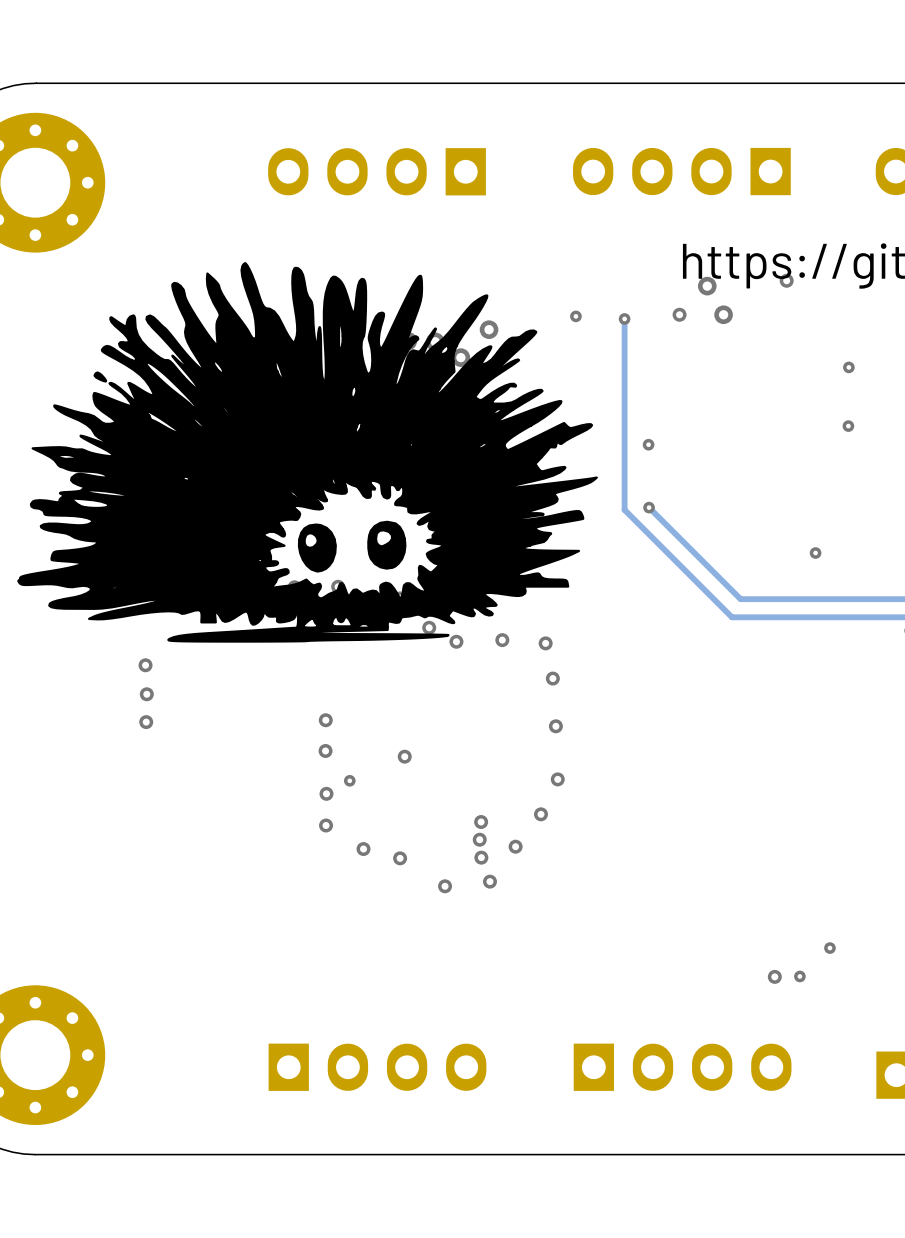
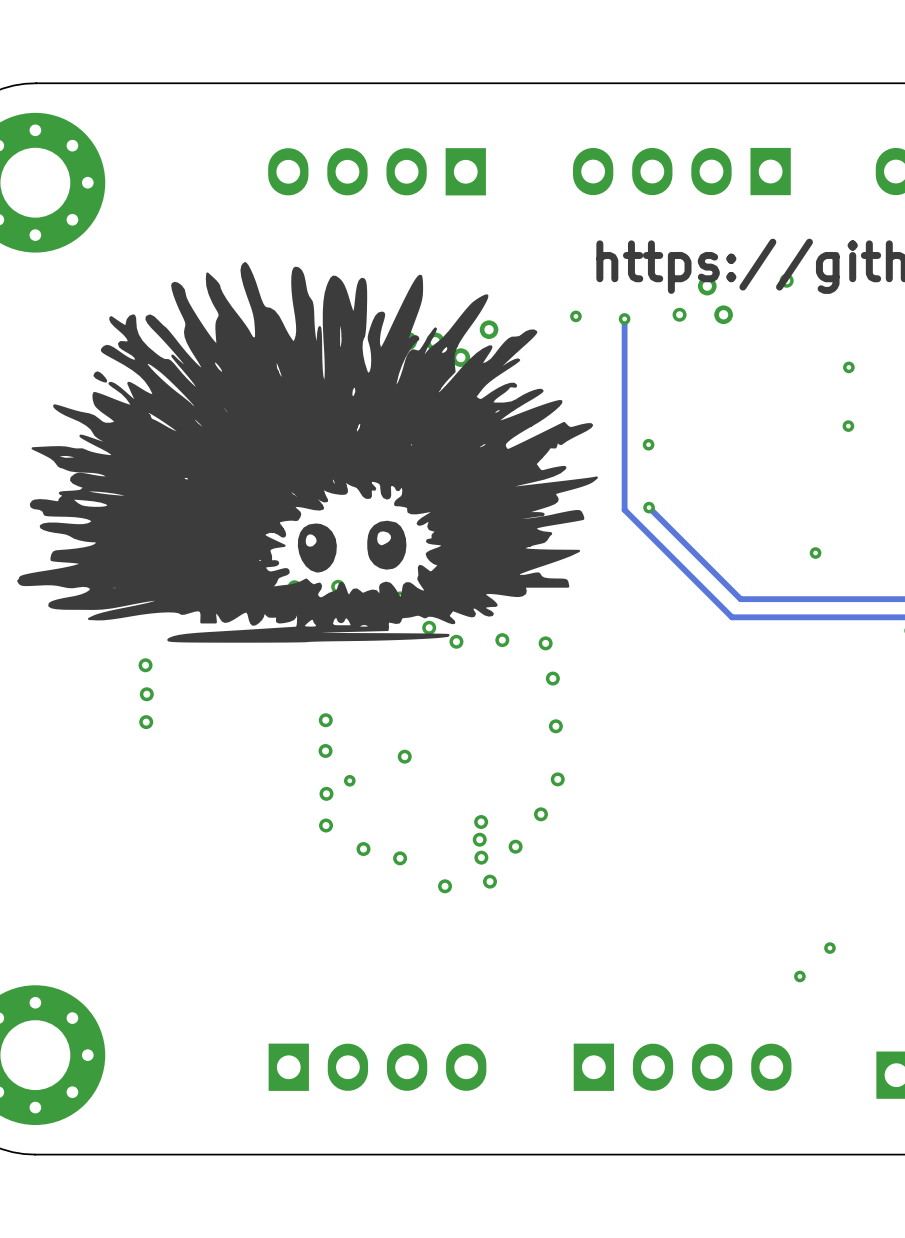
via: (774, 976) -> none

